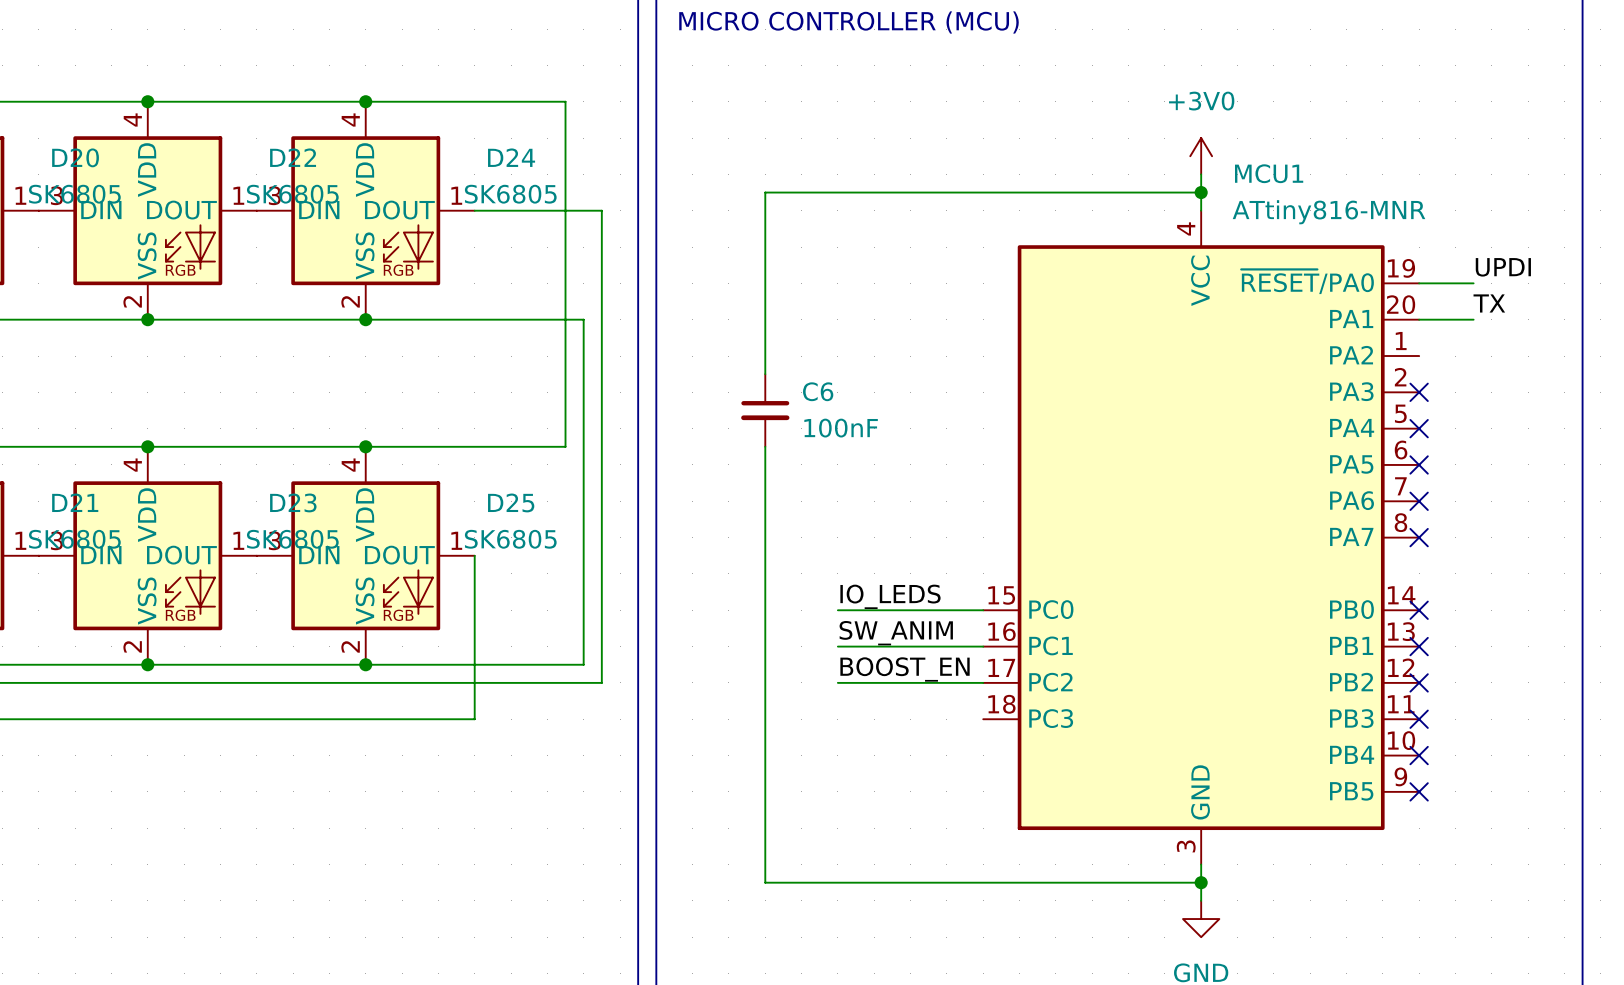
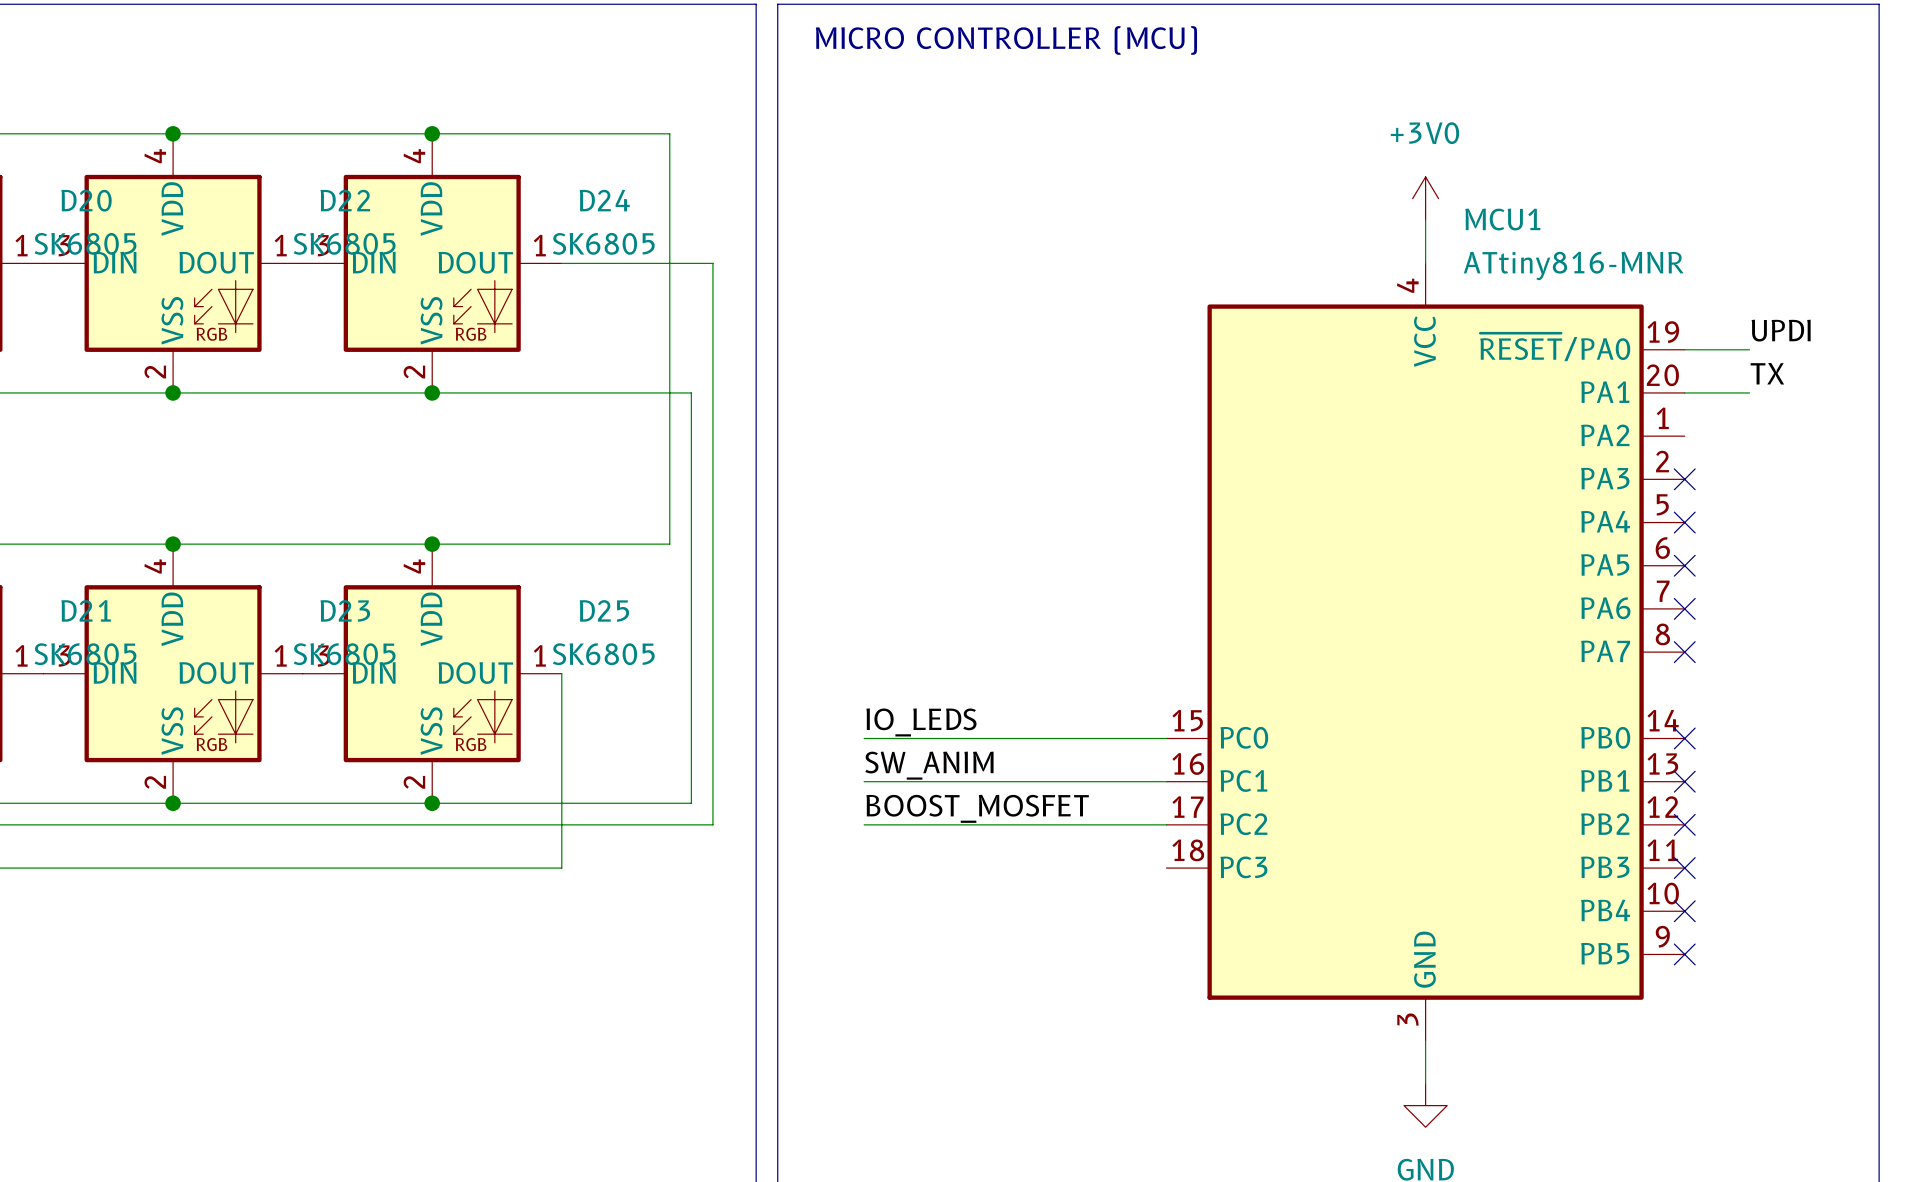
wire: (1201, 192) (765, 192) (765, 374) -> none
junction: (1201, 192) -> none
C6: 100nF (765, 410) -> none
wire: (765, 446) (765, 882) (1201, 882) -> none
label position: IO_LEDS (890, 596) -> IO_LEDS (921, 722)
wire: none -> (864, 738) (993, 738)
label position: SW_ANIM (896, 633) -> SW_ANIM (929, 765)
wire: none -> (864, 781) (993, 781)
label: BOOST_EN (905, 669) -> BOOST_MOSFET (977, 808)
wire: none -> (864, 824) (993, 824)
junction: (1201, 882) -> none

